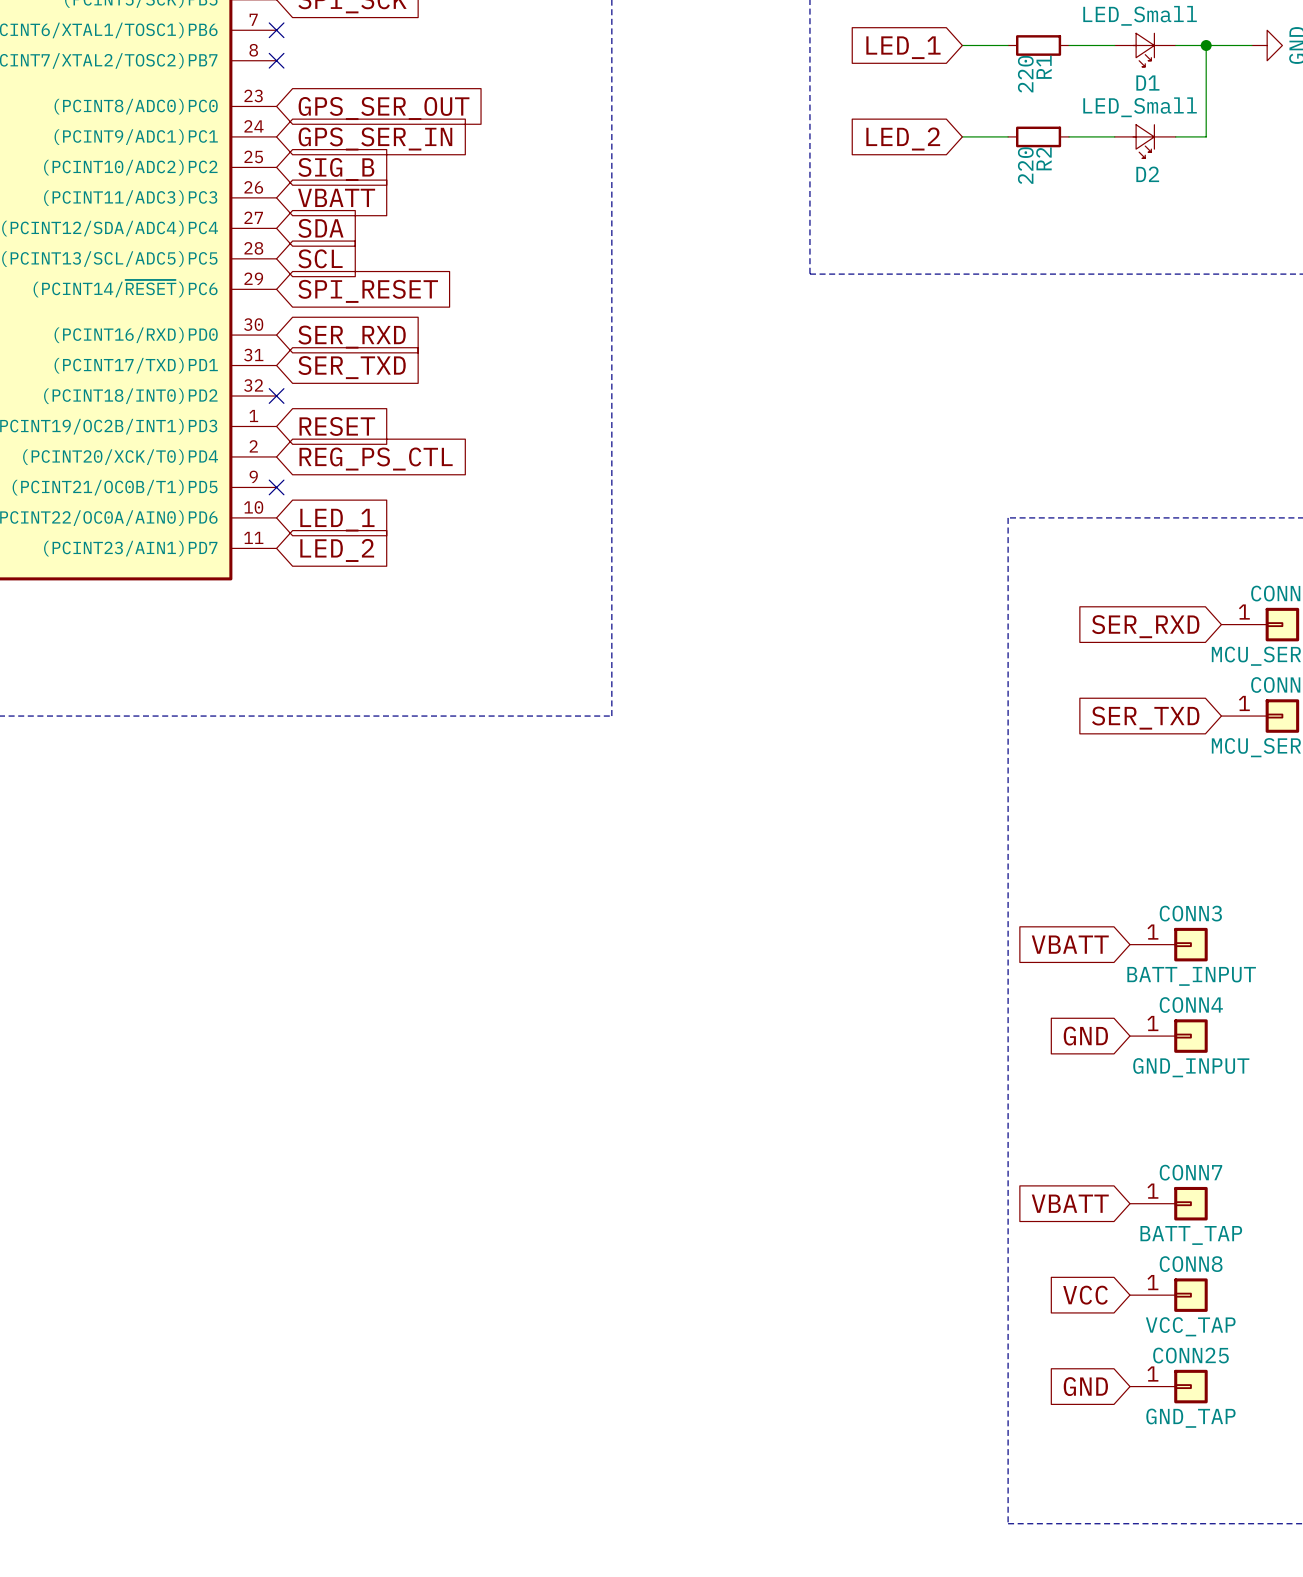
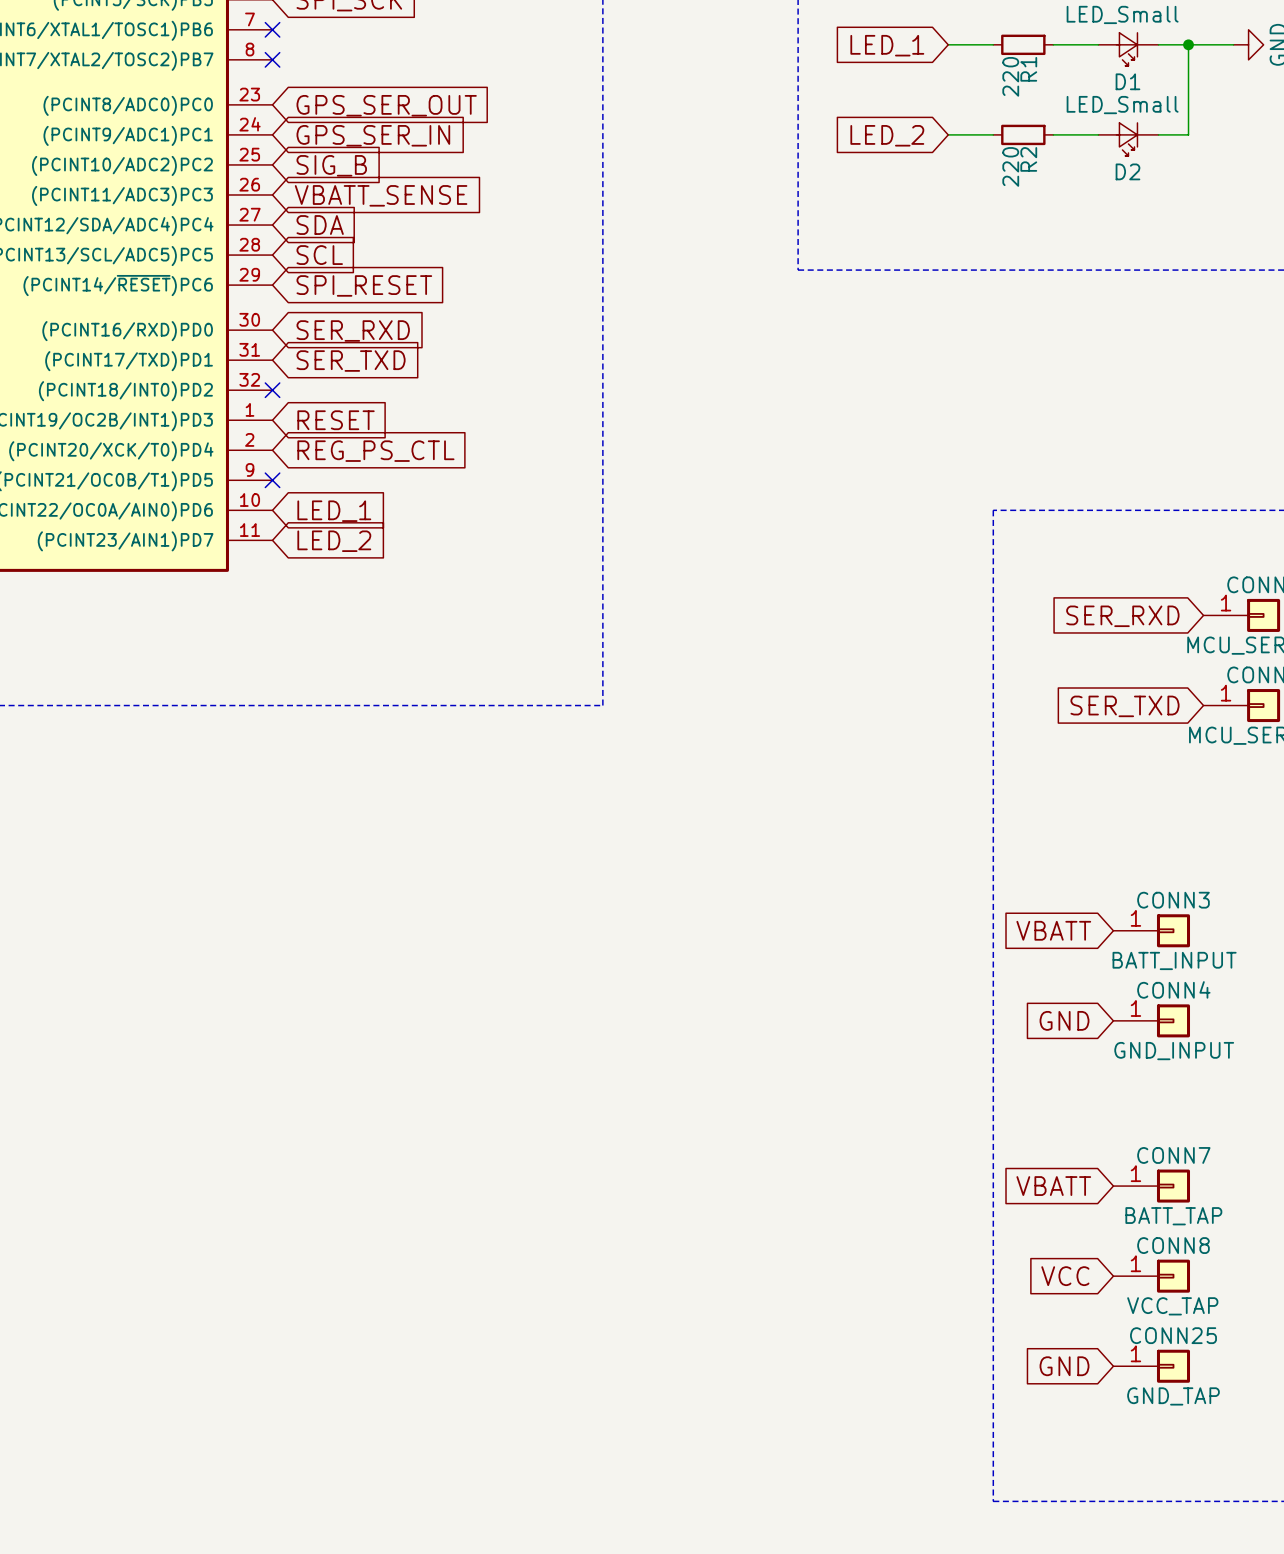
global label: VBATT (336, 197) -> VBATT_SENSE (381, 195)

